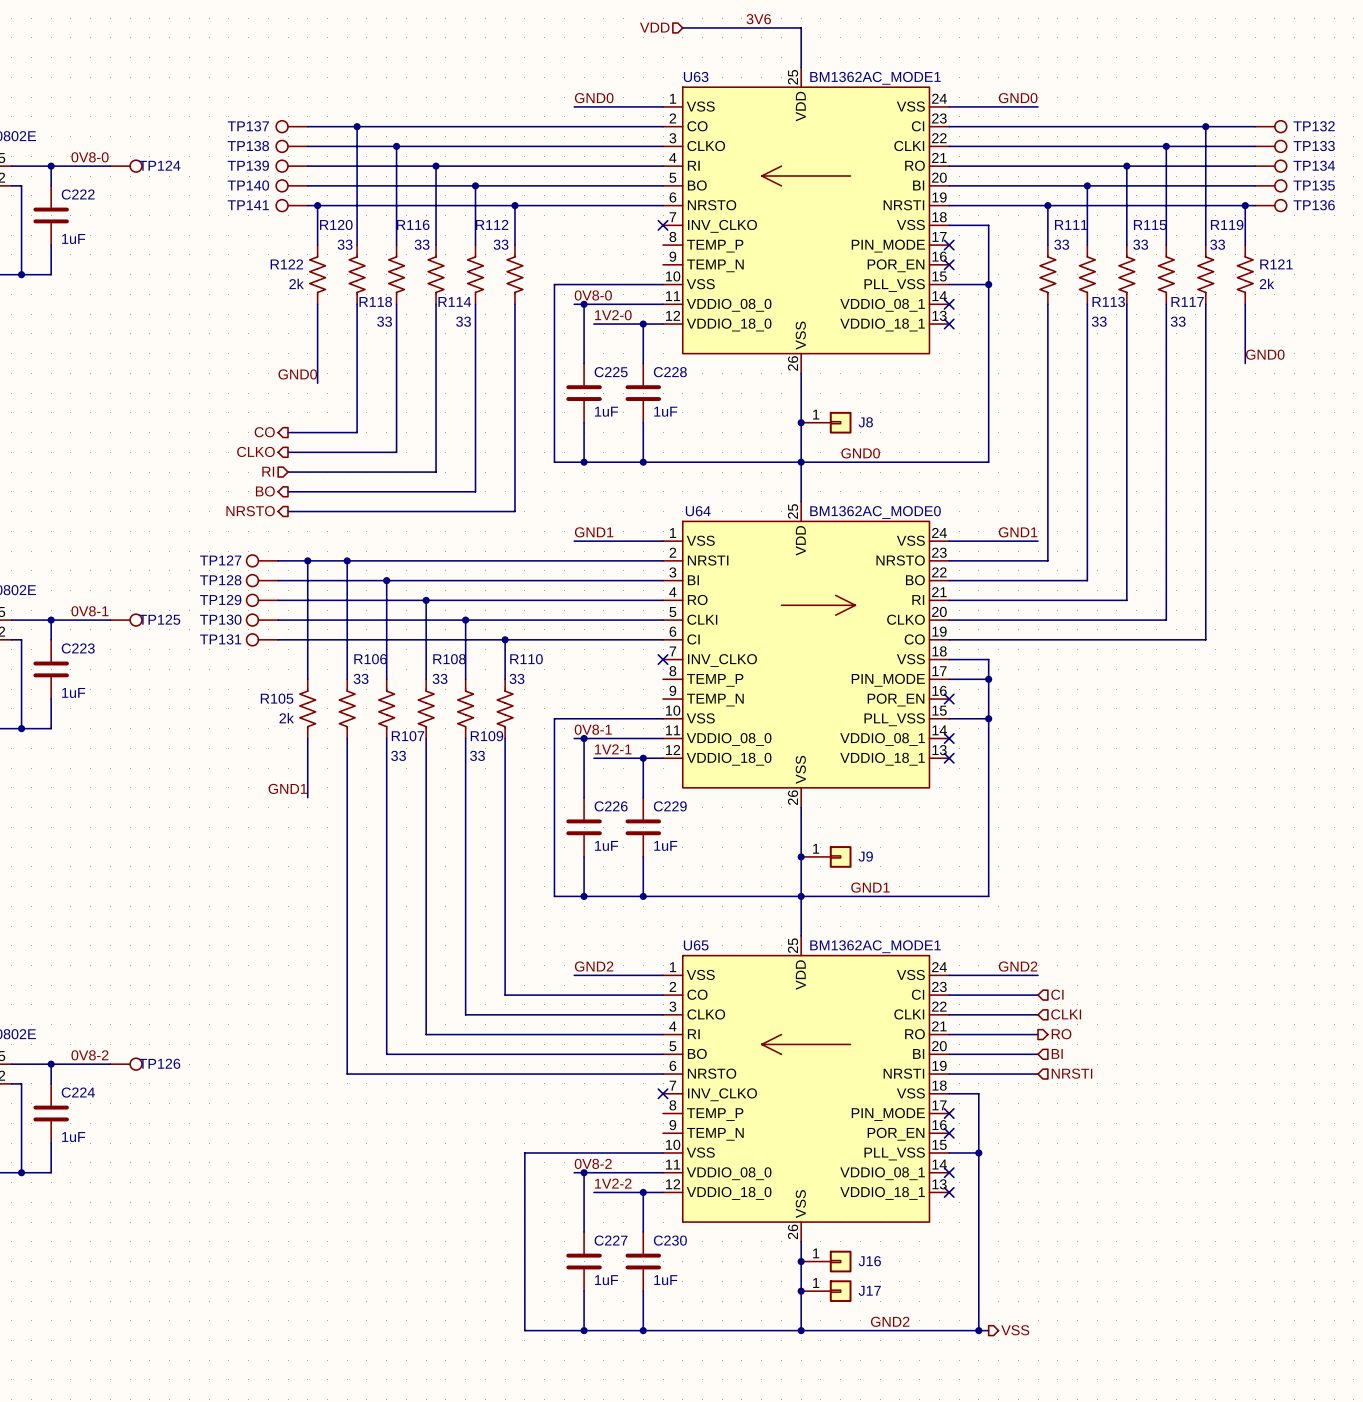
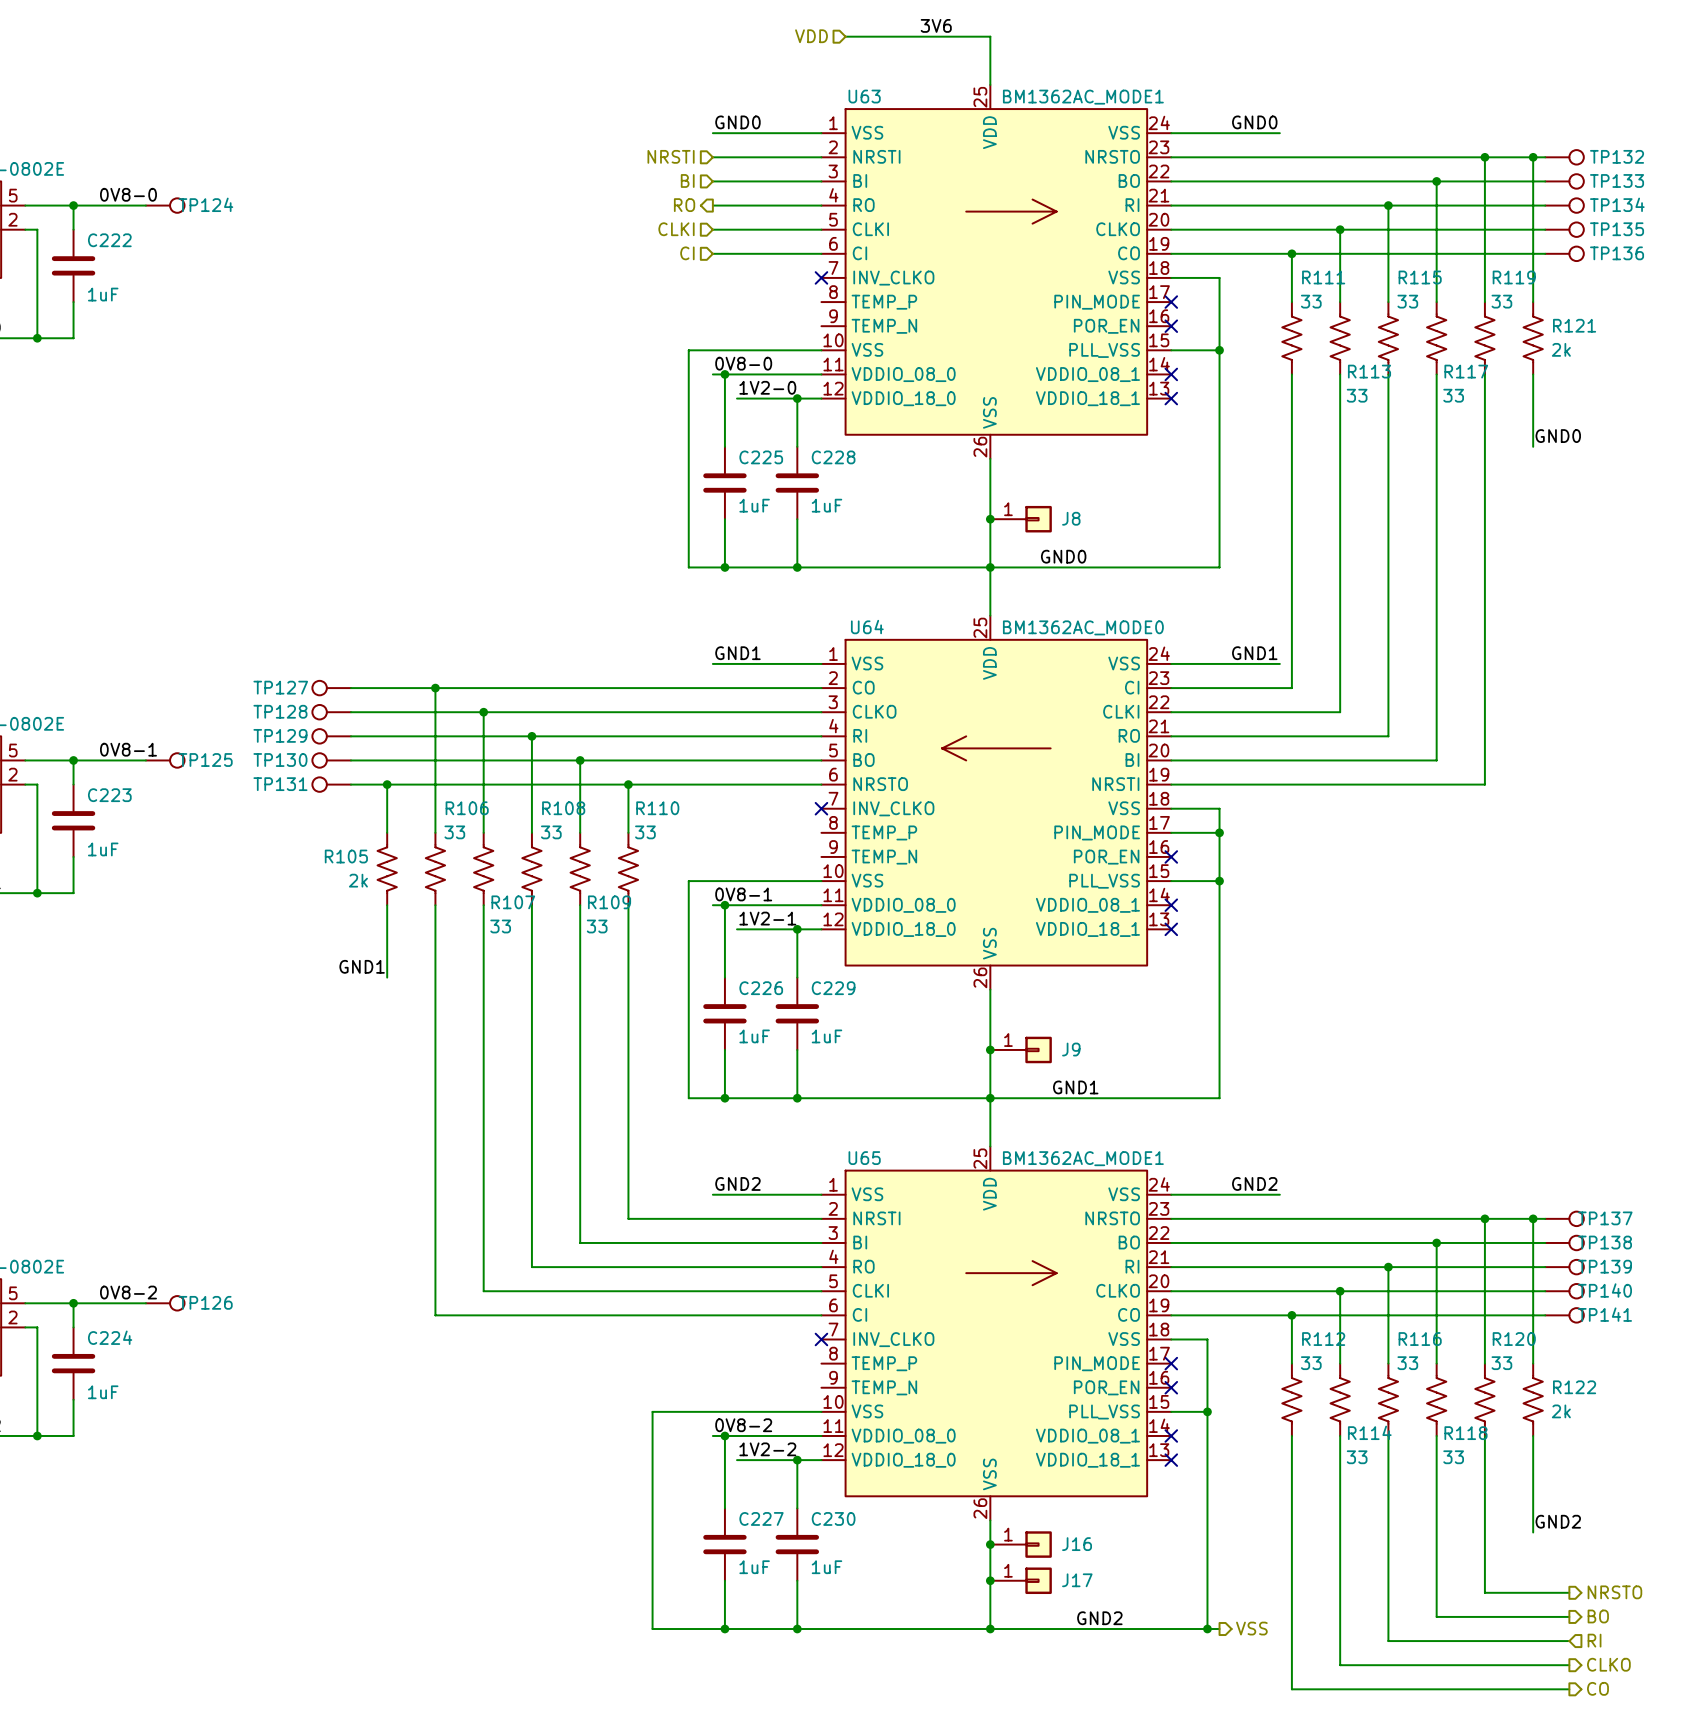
U63 symbol: [663, 67, 950, 374] -> [821, 84, 1172, 459]
TP137 rotation: 0° (282, 126) -> 180° (1576, 1218)
TP137 position: (291, 126) -> (1564, 1218)
wire: (307, 126) (574, 126) -> none
wire: (357, 126) (357, 245) -> none
junction: (357, 126) -> none
hierarchical label: none -> NRSTI (671, 156)
wire: none -> (1533, 157) (1533, 253)
junction: none -> (1533, 157)
TP138 rotation: 0° (282, 146) -> 180° (1576, 1242)
TP138 position: (291, 146) -> (1564, 1242)
wire: (307, 146) (574, 146) -> none
wire: (396, 146) (396, 245) -> none
junction: (396, 146) -> none
hierarchical label: none -> BI (687, 180)
hierarchical label: none -> RO (684, 205)
TP139 rotation: 0° (282, 166) -> 180° (1576, 1267)
TP139 position: (291, 166) -> (1564, 1267)
wire: (307, 166) (574, 166) -> none
wire: (436, 166) (436, 245) -> none
junction: (436, 166) -> none
TP140 rotation: 0° (282, 185) -> 180° (1576, 1291)
TP140 position: (291, 185) -> (1564, 1291)
wire: (307, 185) (574, 185) -> none
wire: (475, 185) (475, 245) -> none
junction: (475, 185) -> none
hierarchical label: none -> CLKI (676, 229)
TP141 rotation: 0° (282, 205) -> 180° (1576, 1315)
TP141 position: (291, 205) -> (1564, 1315)
wire: (307, 205) (574, 205) -> none
wire: (317, 205) (317, 245) -> none
junction: (317, 205) -> none
wire: (514, 205) (514, 245) -> none
junction: (514, 205) -> none
hierarchical label: none -> CI (687, 253)
junction: (1245, 205) -> none
R122 flip: as is (317, 274) -> left-right (1533, 1399)
R122 position: (317, 274) -> (1533, 1399)
R120 flip: as is (357, 274) -> left-right (1484, 1399)
R120 position: (357, 274) -> (1484, 1399)
R118 flip: as is (396, 274) -> left-right (1436, 1399)
R118 position: (396, 274) -> (1436, 1399)
R116 flip: as is (436, 274) -> left-right (1388, 1399)
R116 position: (436, 274) -> (1388, 1399)
R114 flip: as is (475, 274) -> left-right (1340, 1399)
R114 position: (475, 274) -> (1340, 1399)
R112 flip: as is (514, 274) -> left-right (1291, 1399)
R112 position: (514, 274) -> (1291, 1399)
wire: (317, 304) (317, 383) -> none
wire: (357, 304) (357, 432) (288, 432) -> none
wire: (396, 304) (396, 452) (288, 452) -> none
wire: (436, 304) (436, 472) (288, 472) -> none
wire: (475, 304) (475, 491) (288, 491) -> none
wire: (514, 304) (514, 511) (288, 511) -> none
label: GND0 (297, 374) -> none
hierarchical label: CO (264, 432) -> none
hierarchical label: CLKO (255, 451) -> none
hierarchical label: RI (268, 471) -> none
hierarchical label: BO (265, 491) -> none
U64 symbol: [663, 501, 950, 808] -> [821, 615, 1172, 990]
hierarchical label: NRSTO (250, 511) -> none
wire: (307, 560) (307, 639) -> none
junction: (307, 560) -> none
junction: none -> (387, 784)
U65 symbol: [663, 935, 950, 1242] -> [821, 1146, 1172, 1521]
hierarchical label: CI (1057, 994) -> none
wire: none -> (1279, 1218) (1545, 1218)
wire: none -> (1484, 1218) (1484, 1363)
junction: none -> (1484, 1218)
wire: none -> (1533, 1218) (1533, 1363)
junction: none -> (1533, 1218)
wire: none -> (1279, 1242) (1545, 1242)
hierarchical label: CLKI (1066, 1014) -> none
wire: none -> (1436, 1242) (1436, 1363)
junction: none -> (1436, 1242)
wire: none -> (1279, 1267) (1545, 1267)
hierarchical label: RO (1061, 1034) -> none
wire: none -> (1388, 1267) (1388, 1363)
junction: none -> (1388, 1267)
hierarchical label: BI (1057, 1053) -> none
wire: none -> (1279, 1291) (1545, 1291)
wire: none -> (1340, 1291) (1340, 1363)
junction: none -> (1340, 1291)
hierarchical label: NRSTI (1071, 1073) -> none
wire: none -> (1279, 1315) (1545, 1315)
wire: none -> (1291, 1315) (1291, 1363)
junction: none -> (1291, 1315)
wire: none -> (1291, 1435) (1291, 1689) (1569, 1689)
wire: none -> (1340, 1435) (1340, 1665) (1569, 1665)
wire: none -> (1388, 1435) (1388, 1641) (1569, 1641)
wire: none -> (1436, 1435) (1436, 1616) (1569, 1616)
wire: none -> (1484, 1435) (1484, 1592) (1569, 1592)
wire: none -> (1533, 1435) (1533, 1532)
label: none -> GND2 (1558, 1521)
hierarchical label: none -> NRSTO (1614, 1592)
hierarchical label: none -> BO (1598, 1616)
hierarchical label: none -> RI (1594, 1640)
hierarchical label: none -> CLKO (1608, 1664)
hierarchical label: none -> CO (1597, 1688)

